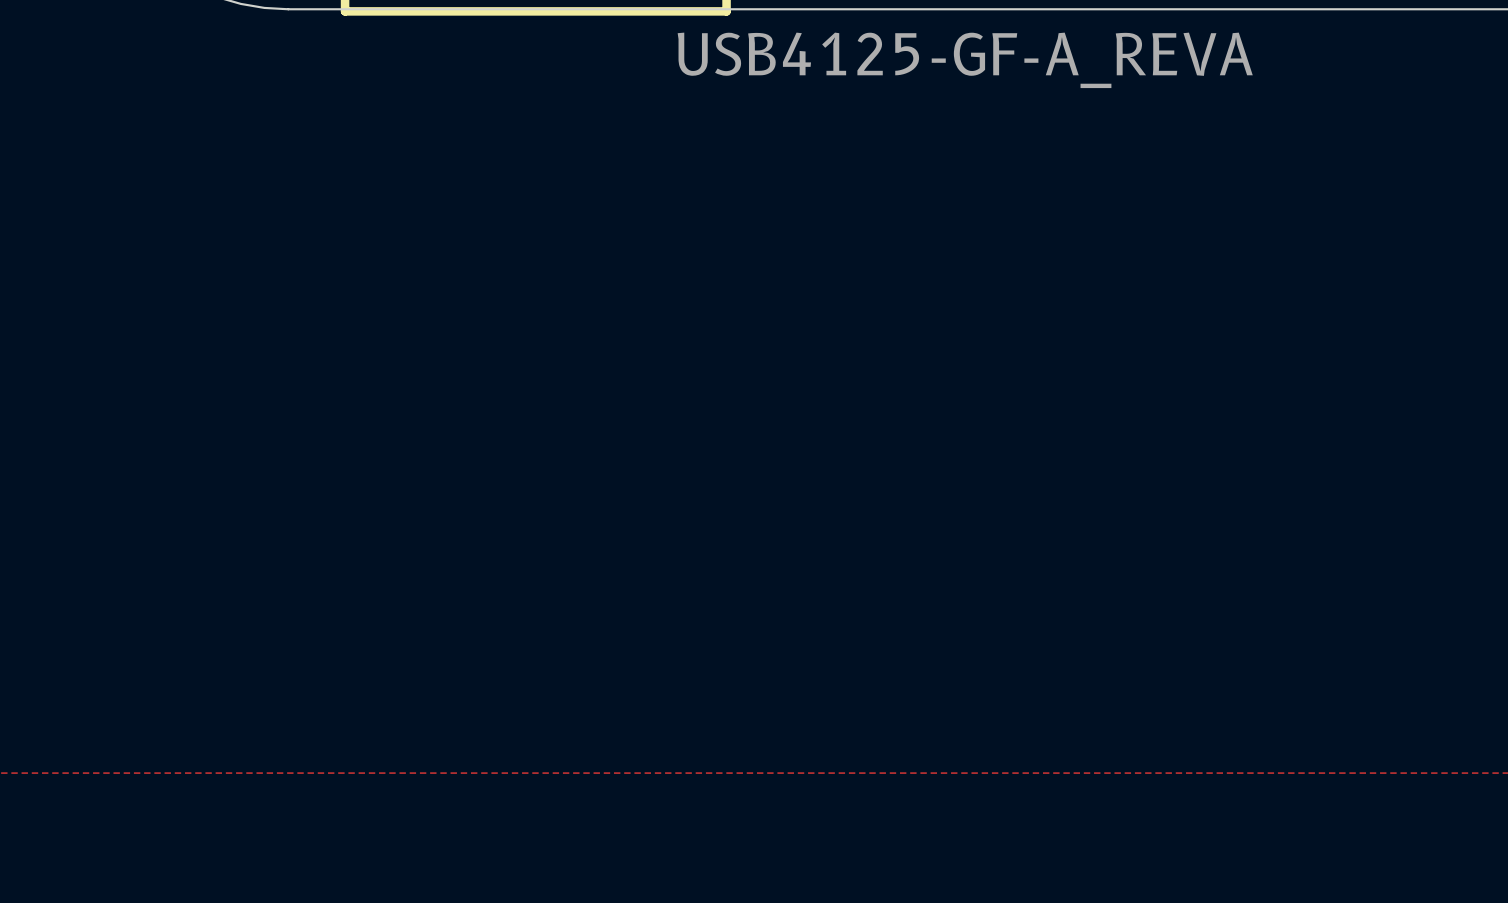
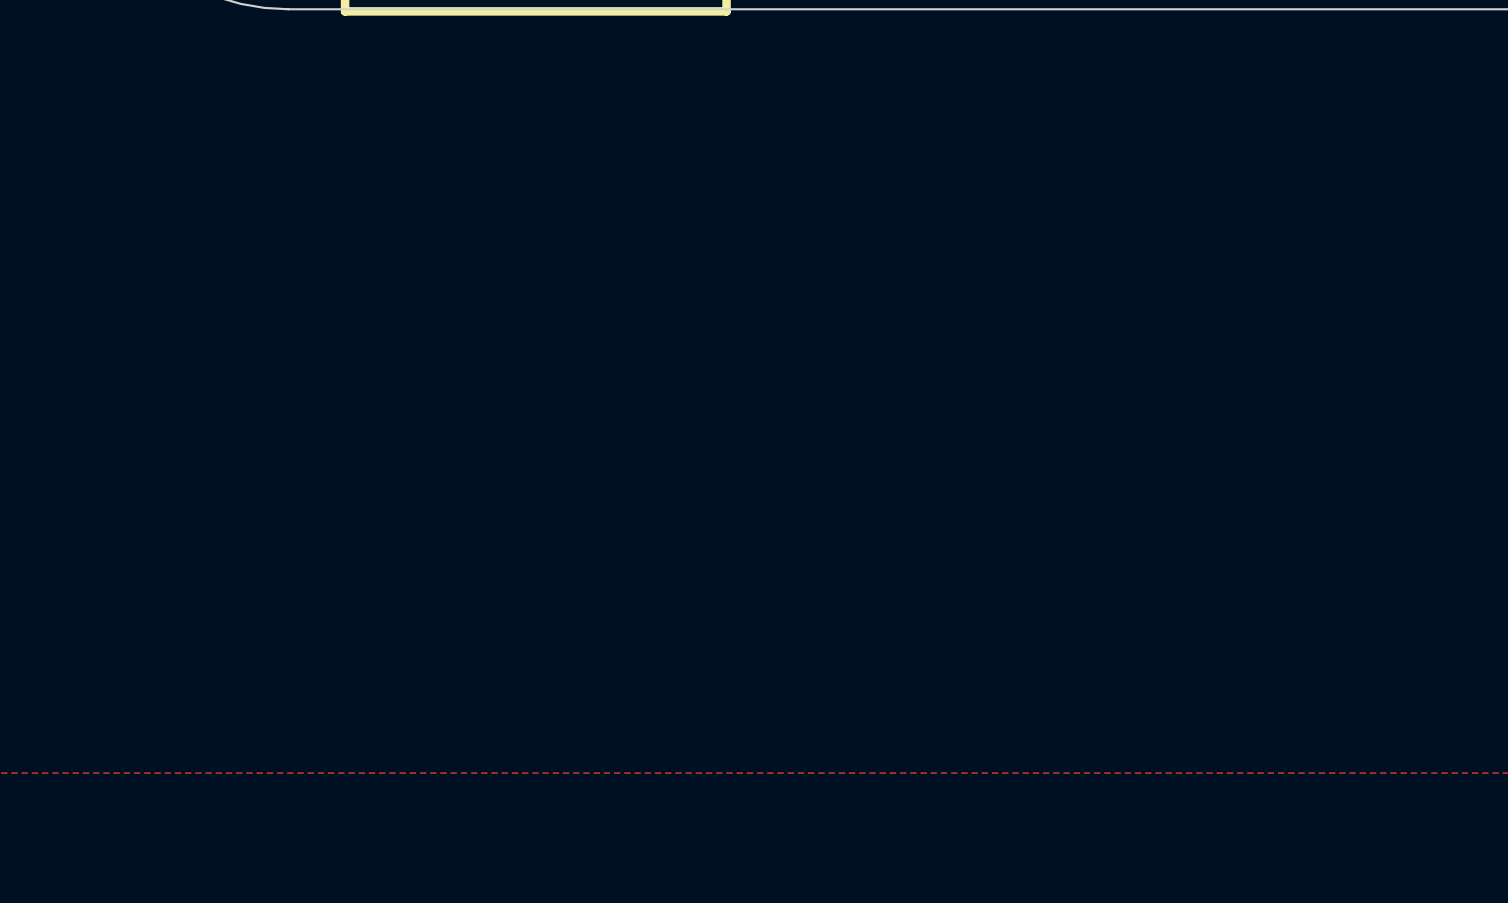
part value: USB4125-GF-A_REVA (965, 60) -> none

